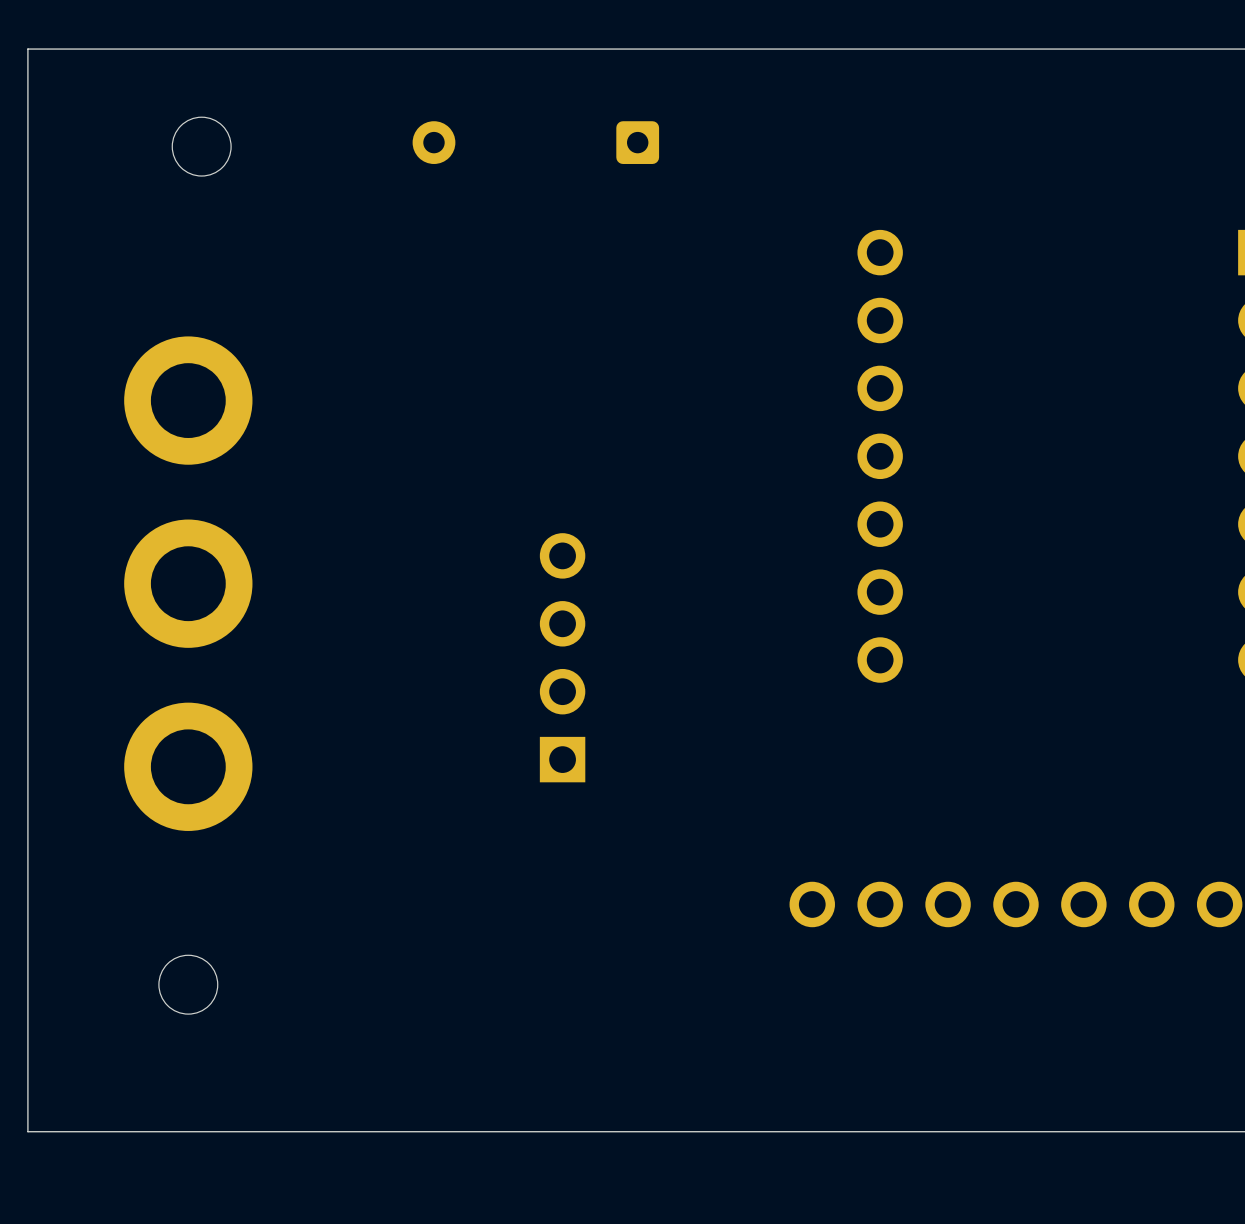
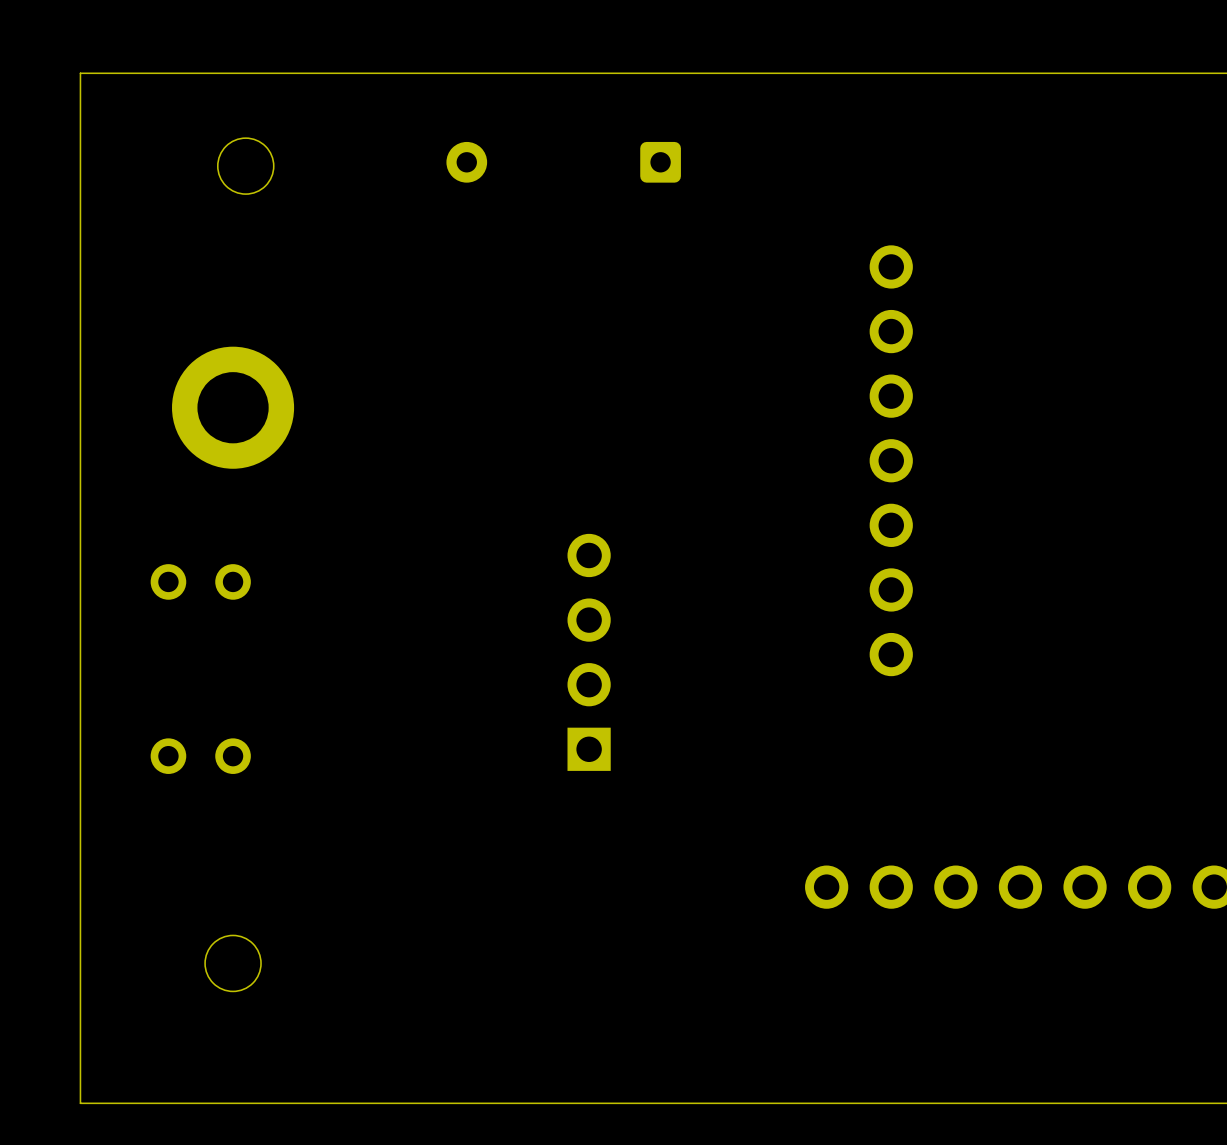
part: none -> (200, 581)
part: (188, 583) -> none
part: none -> (200, 756)
part: (188, 766) -> none

